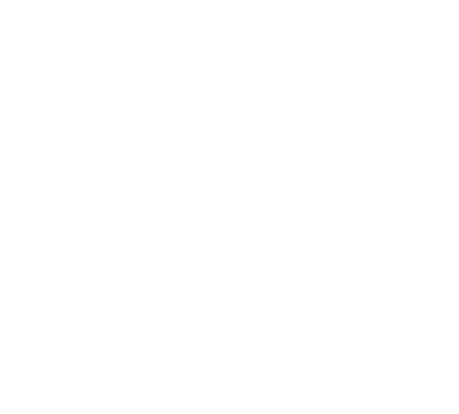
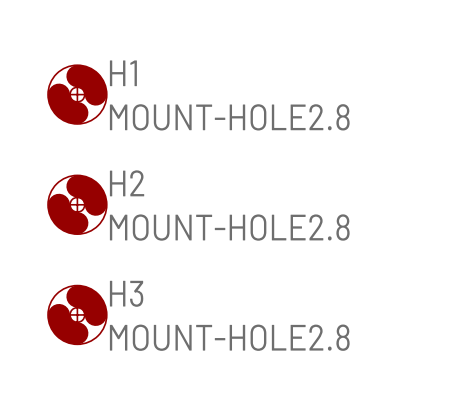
H1: none -> MOUNT-HOLE2.8 (77, 94)
H2: none -> MOUNT-HOLE2.8 (77, 204)
H3: none -> MOUNT-HOLE2.8 (77, 314)

